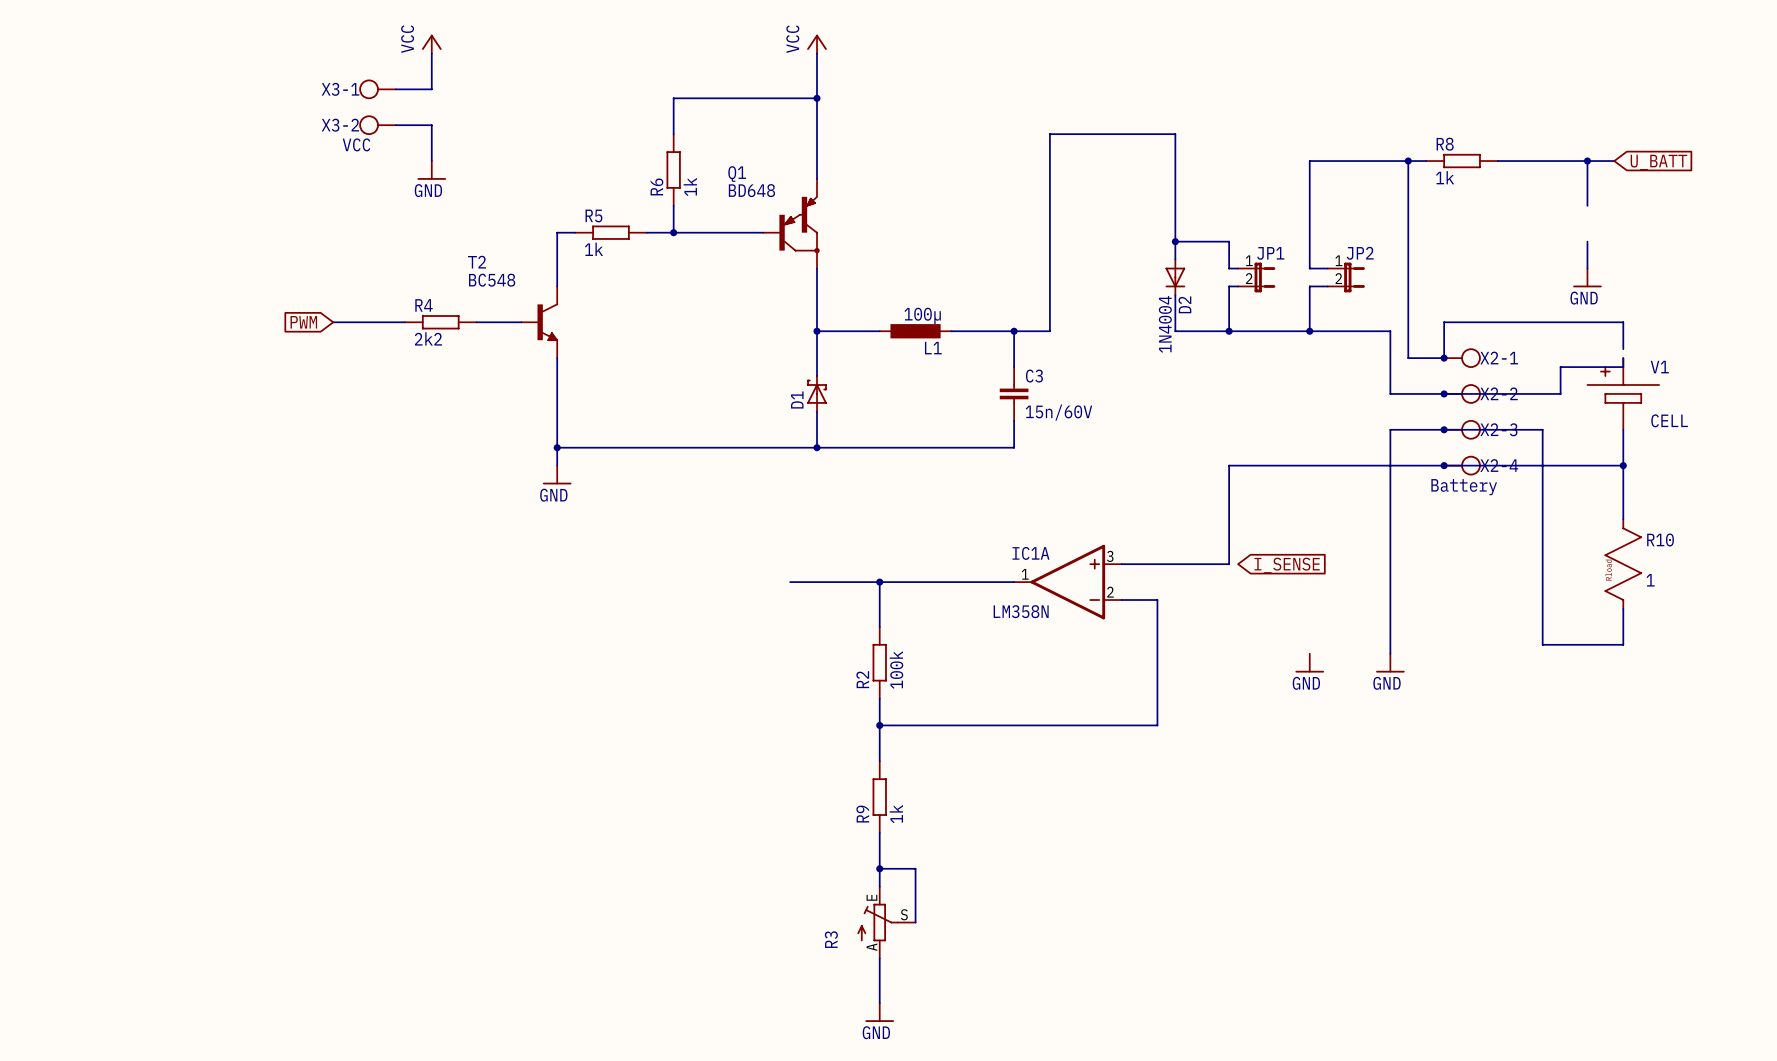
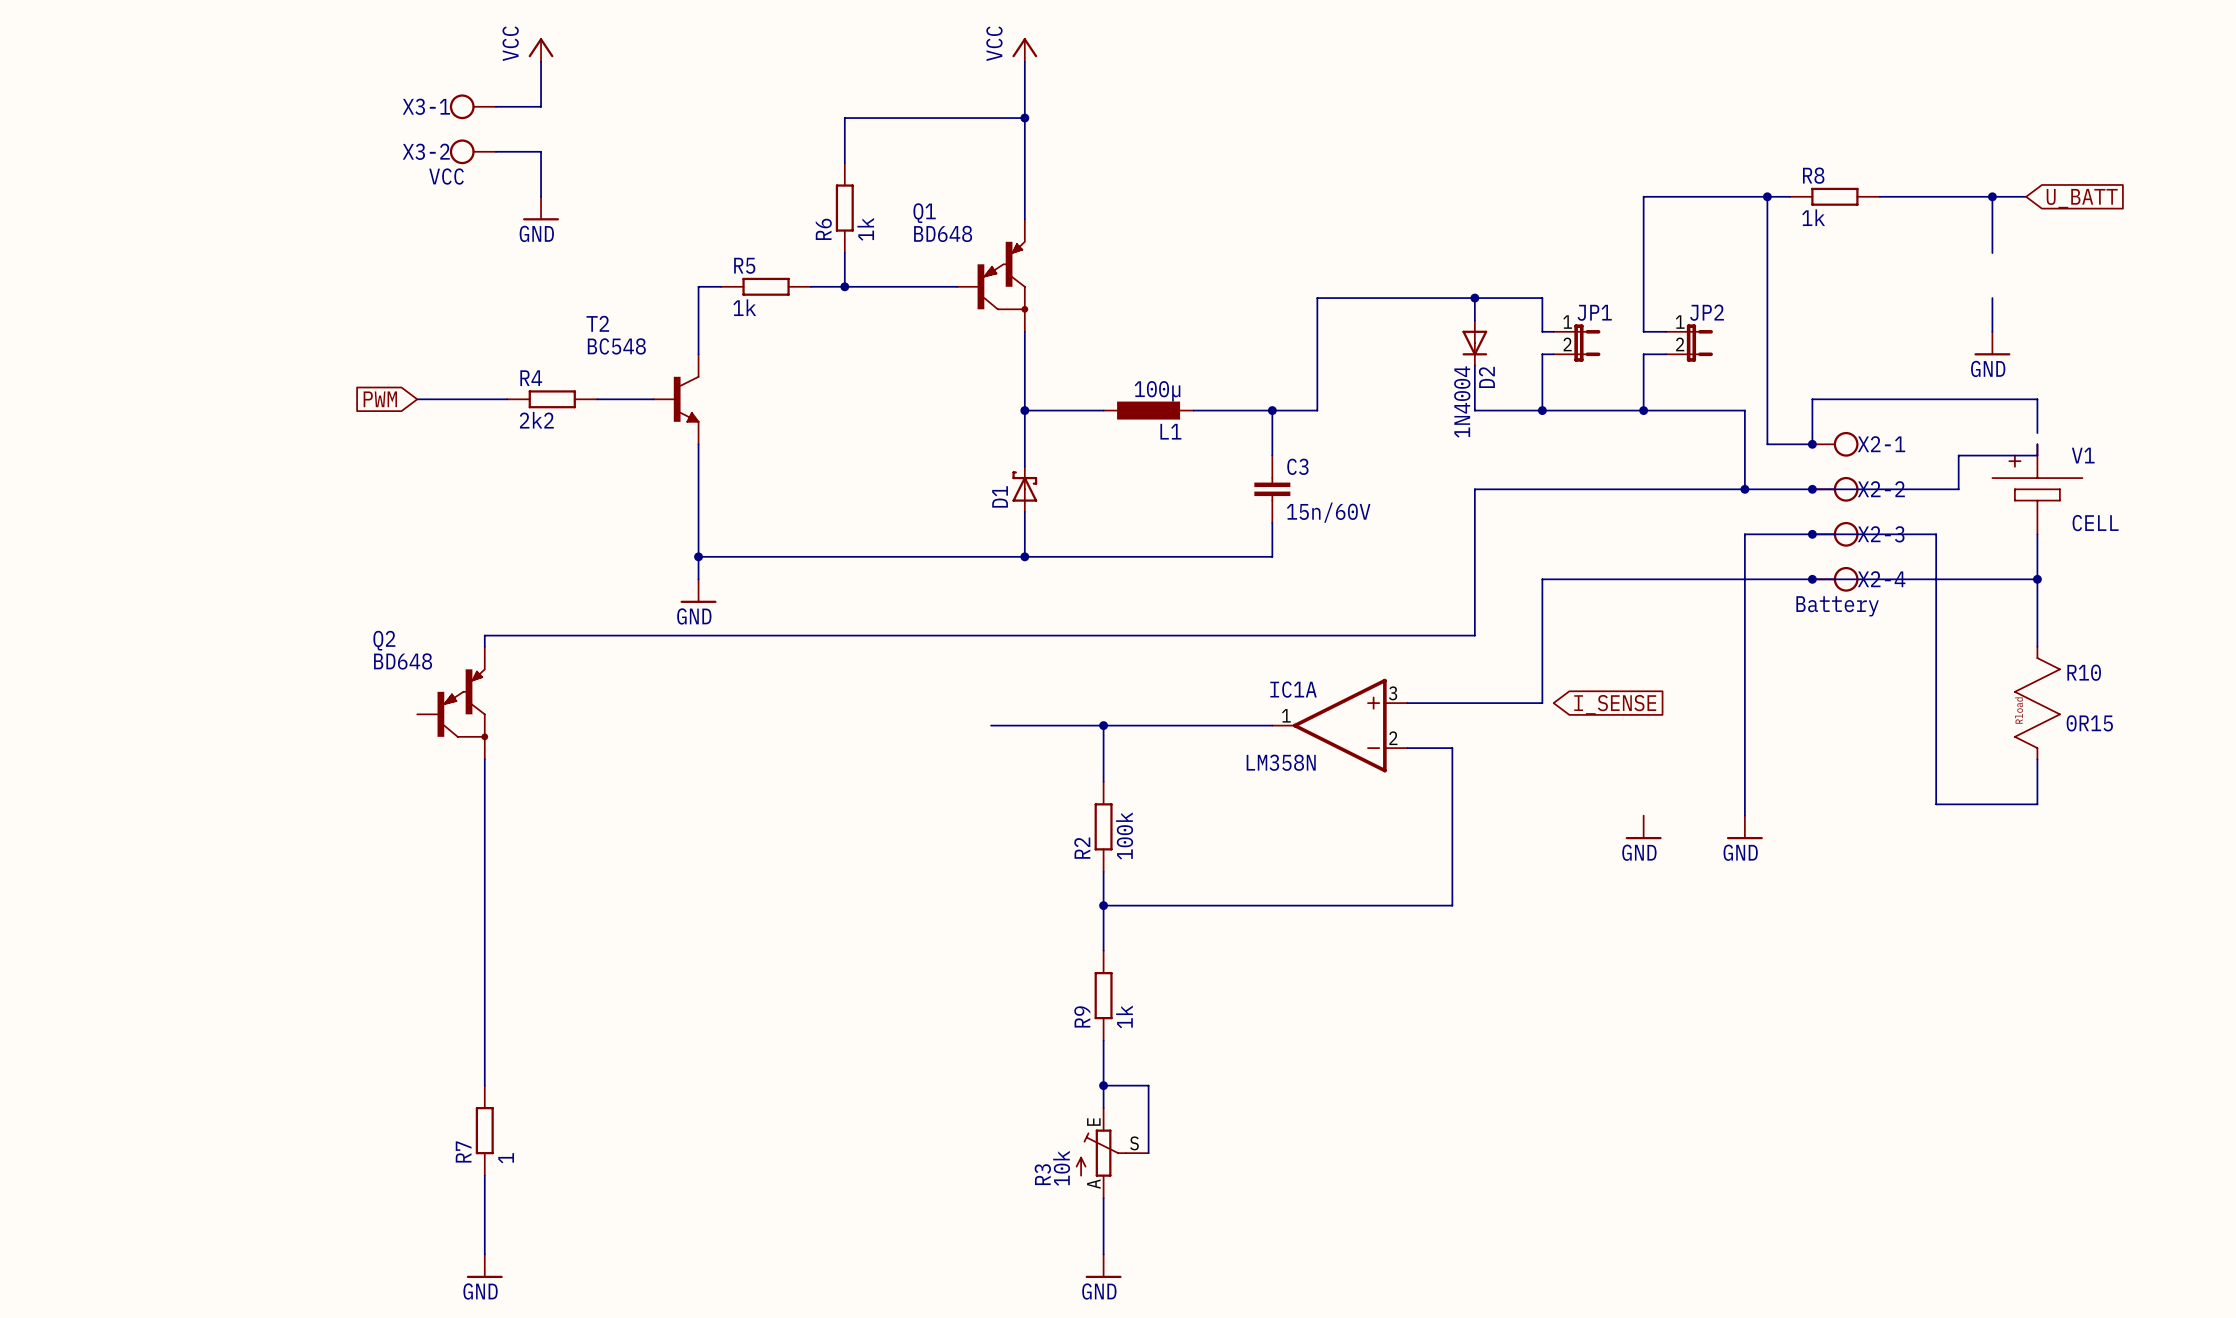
wire: (1049, 241) (1049, 134) (1175, 134) (1175, 241) -> (1317, 298) (1474, 298)
wire: none -> (1744, 489) (1474, 489) (1474, 635) (484, 635) (484, 646)
junction: none -> (1744, 489)
Q2: none -> BD648 (452, 703)
R10 value: 1 (1650, 580) -> 0R15 (2089, 723)
wire: none -> (484, 759) (484, 1085)
R7: none -> 1 (484, 1130)
R3 value: none -> 10k (1061, 1168)
wire: none -> (484, 1175) (484, 1254)
power symbol: none -> GND (484, 1266)

